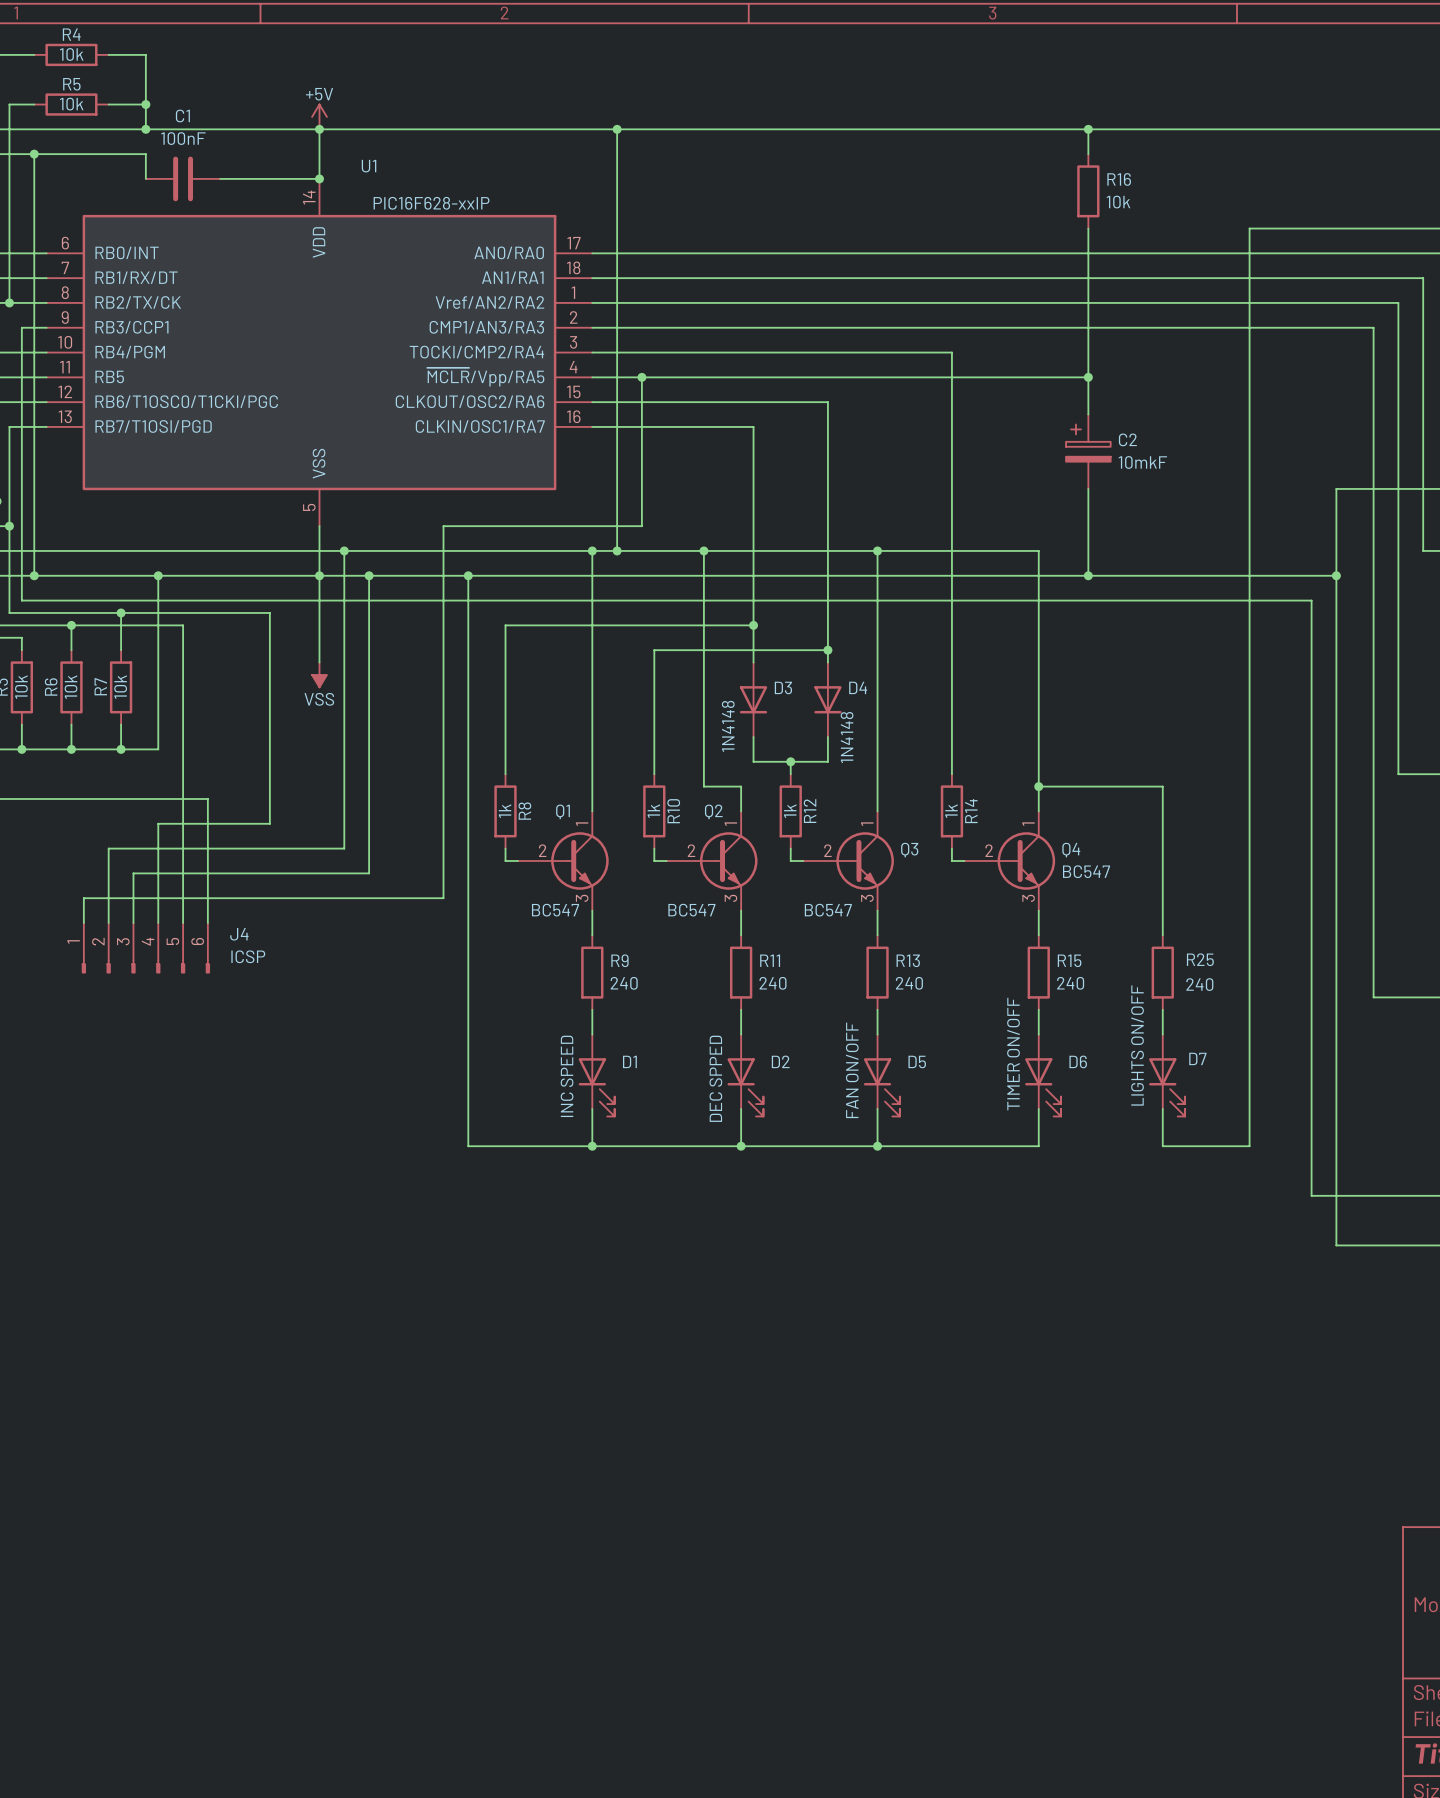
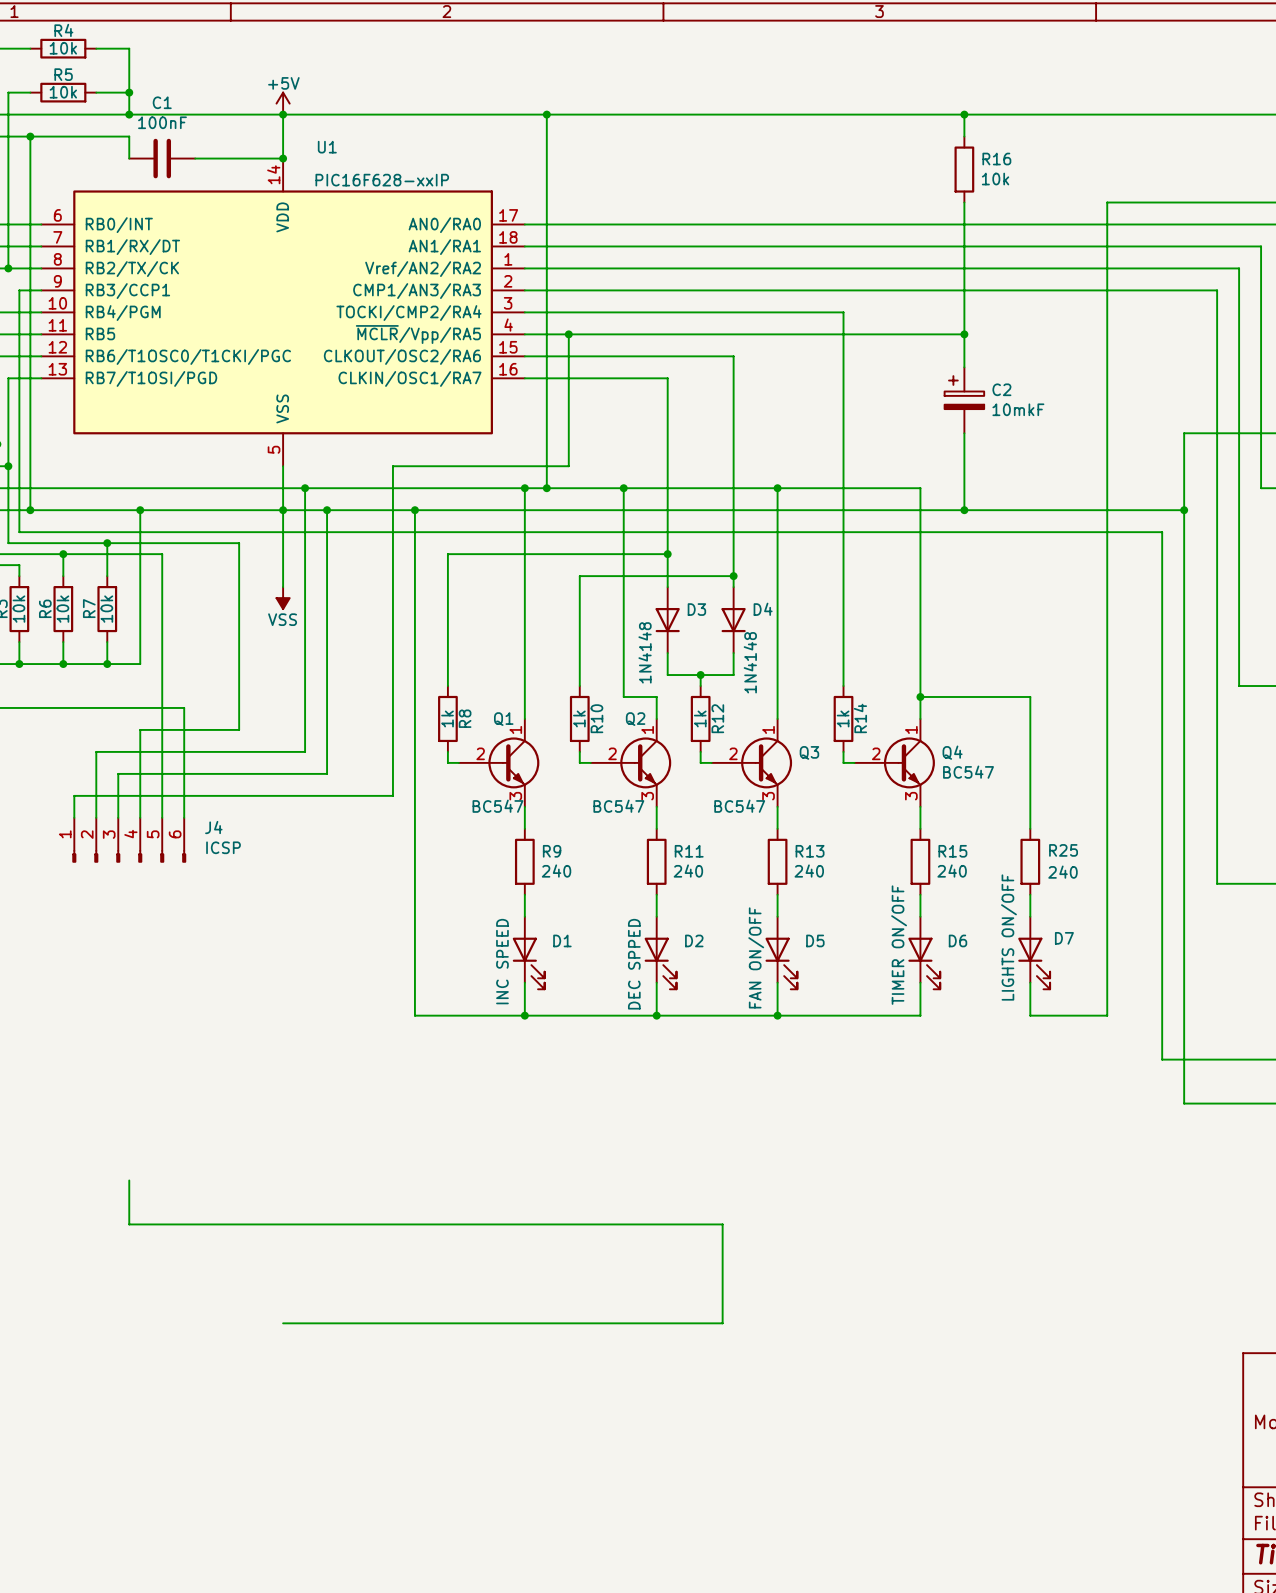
wire: none -> (129, 1180) (129, 1224) (722, 1224) (722, 1323) (283, 1323)

